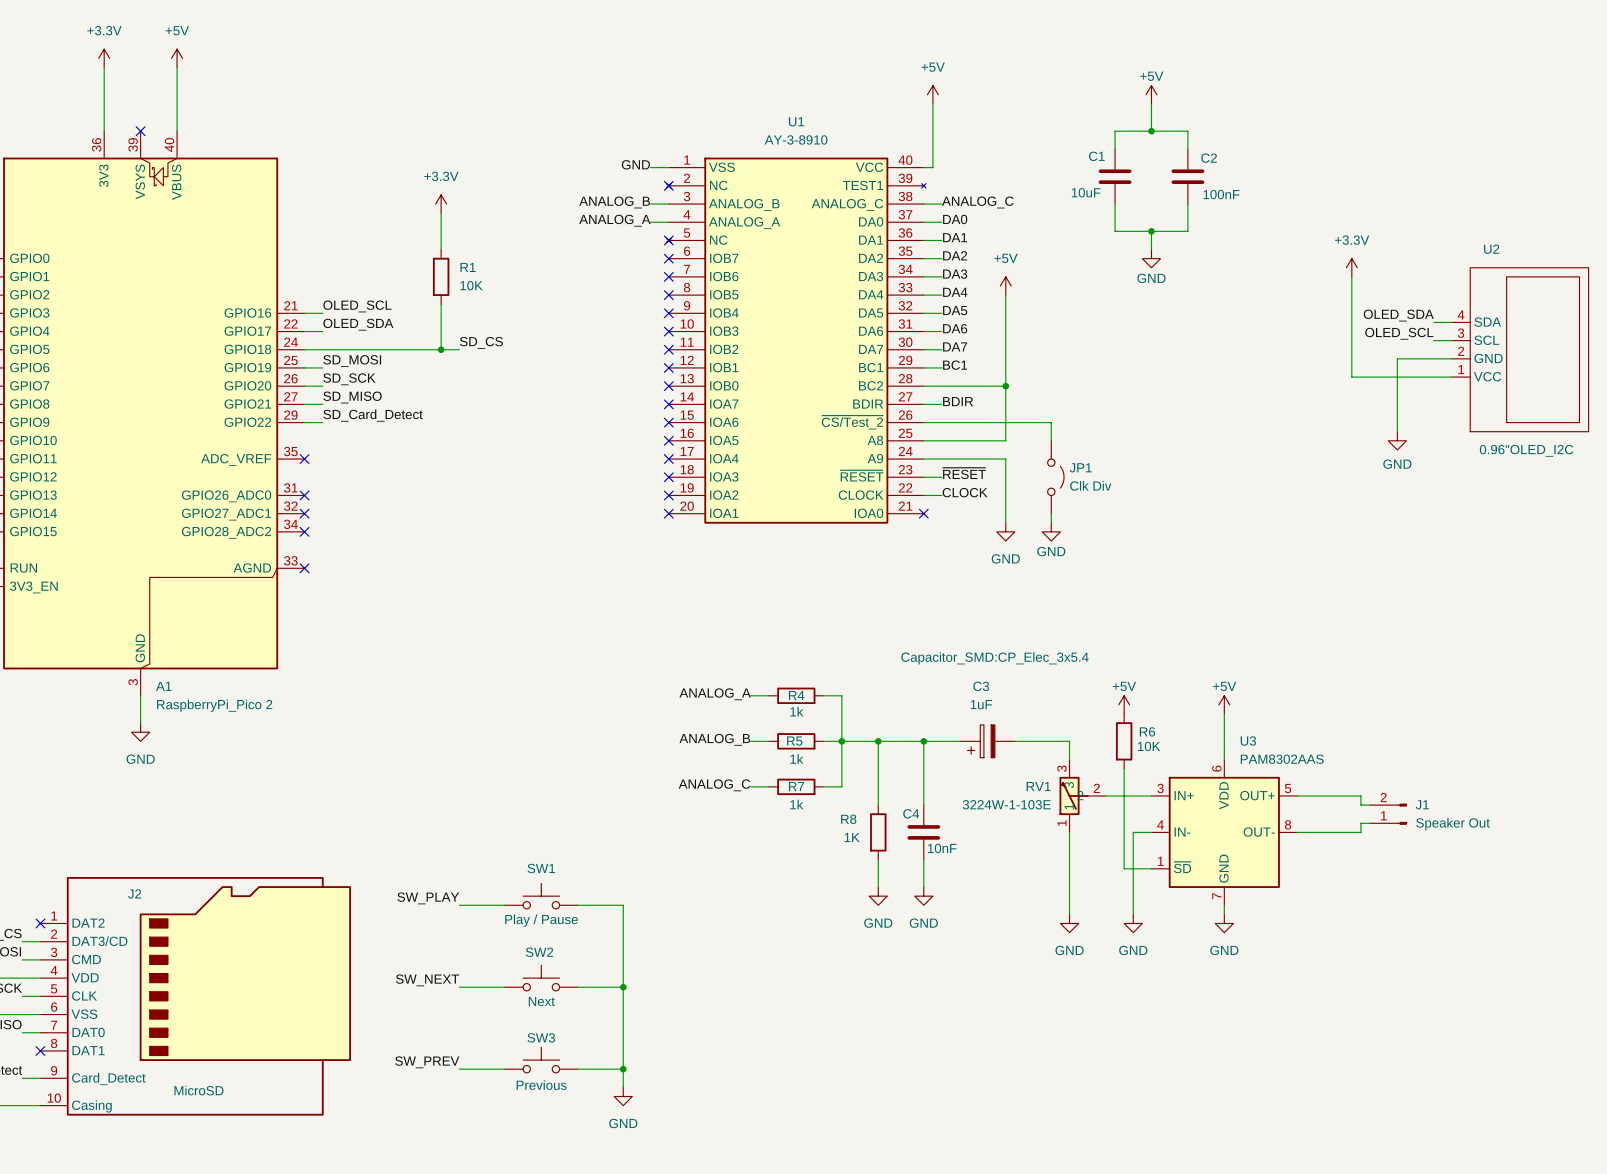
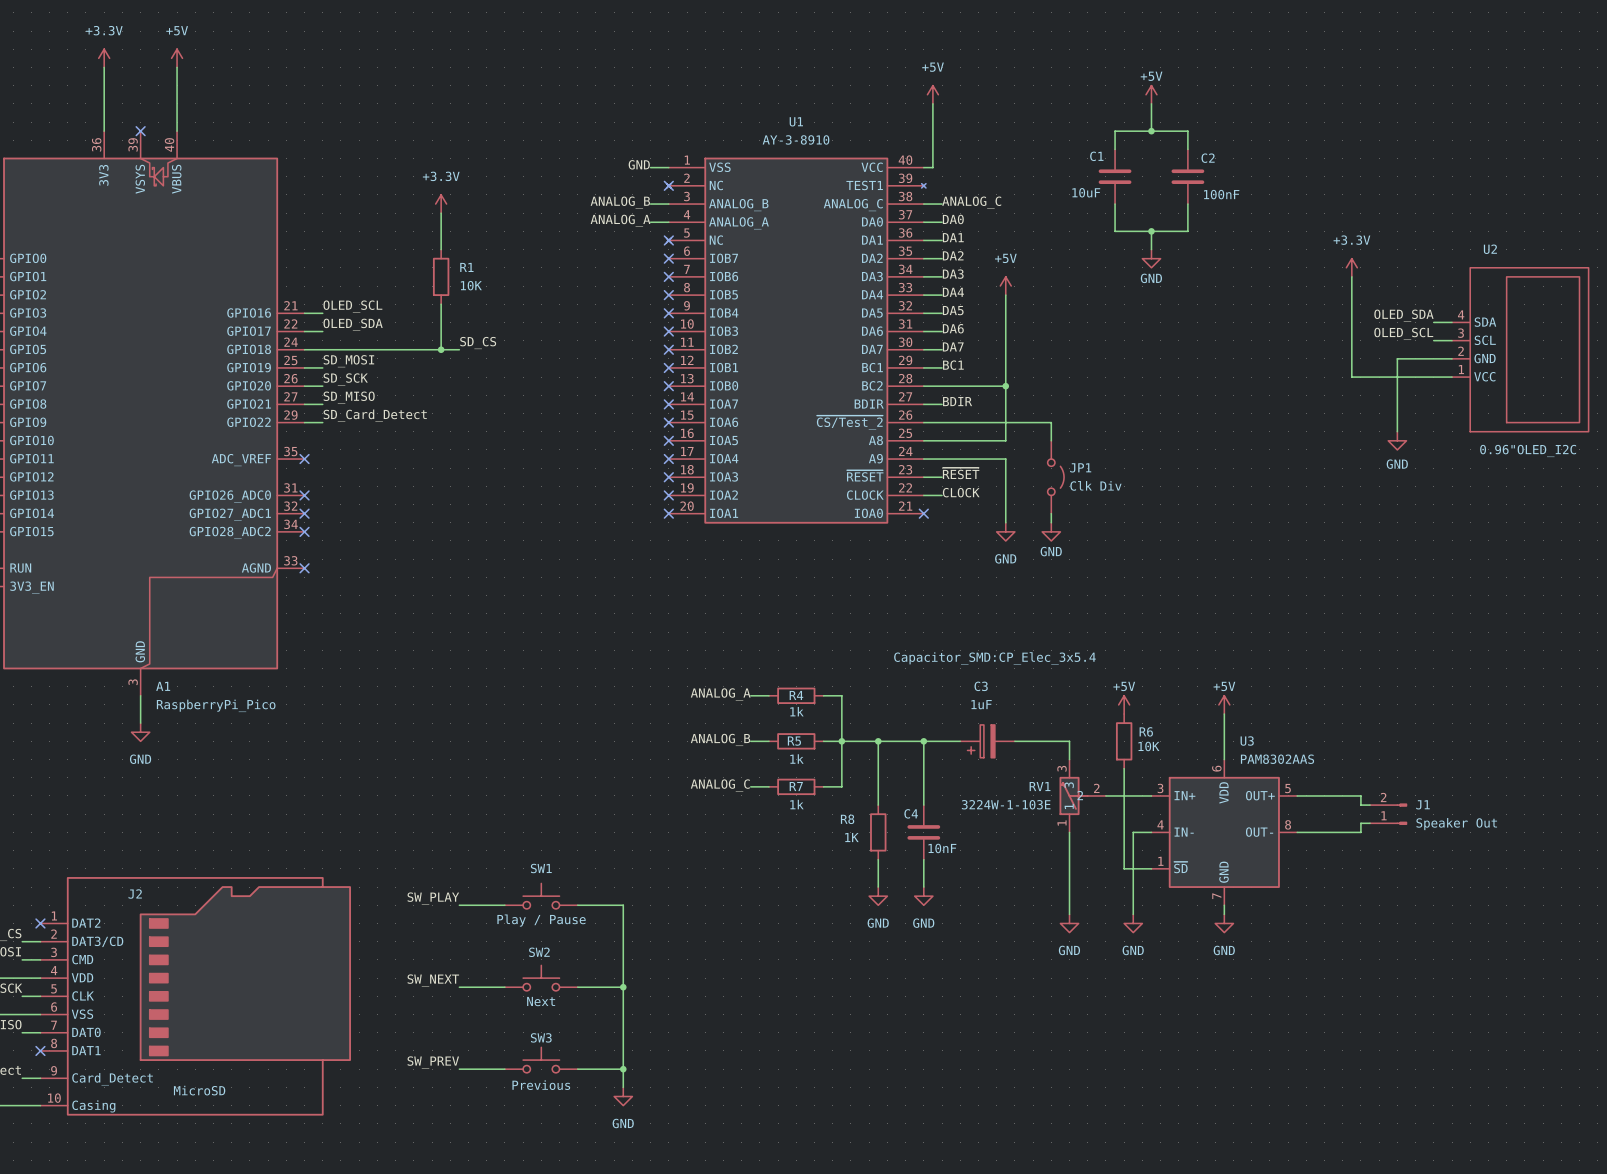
A1 value: RaspberryPi_Pico 2 (214, 705) -> RaspberryPi_Pico (216, 705)

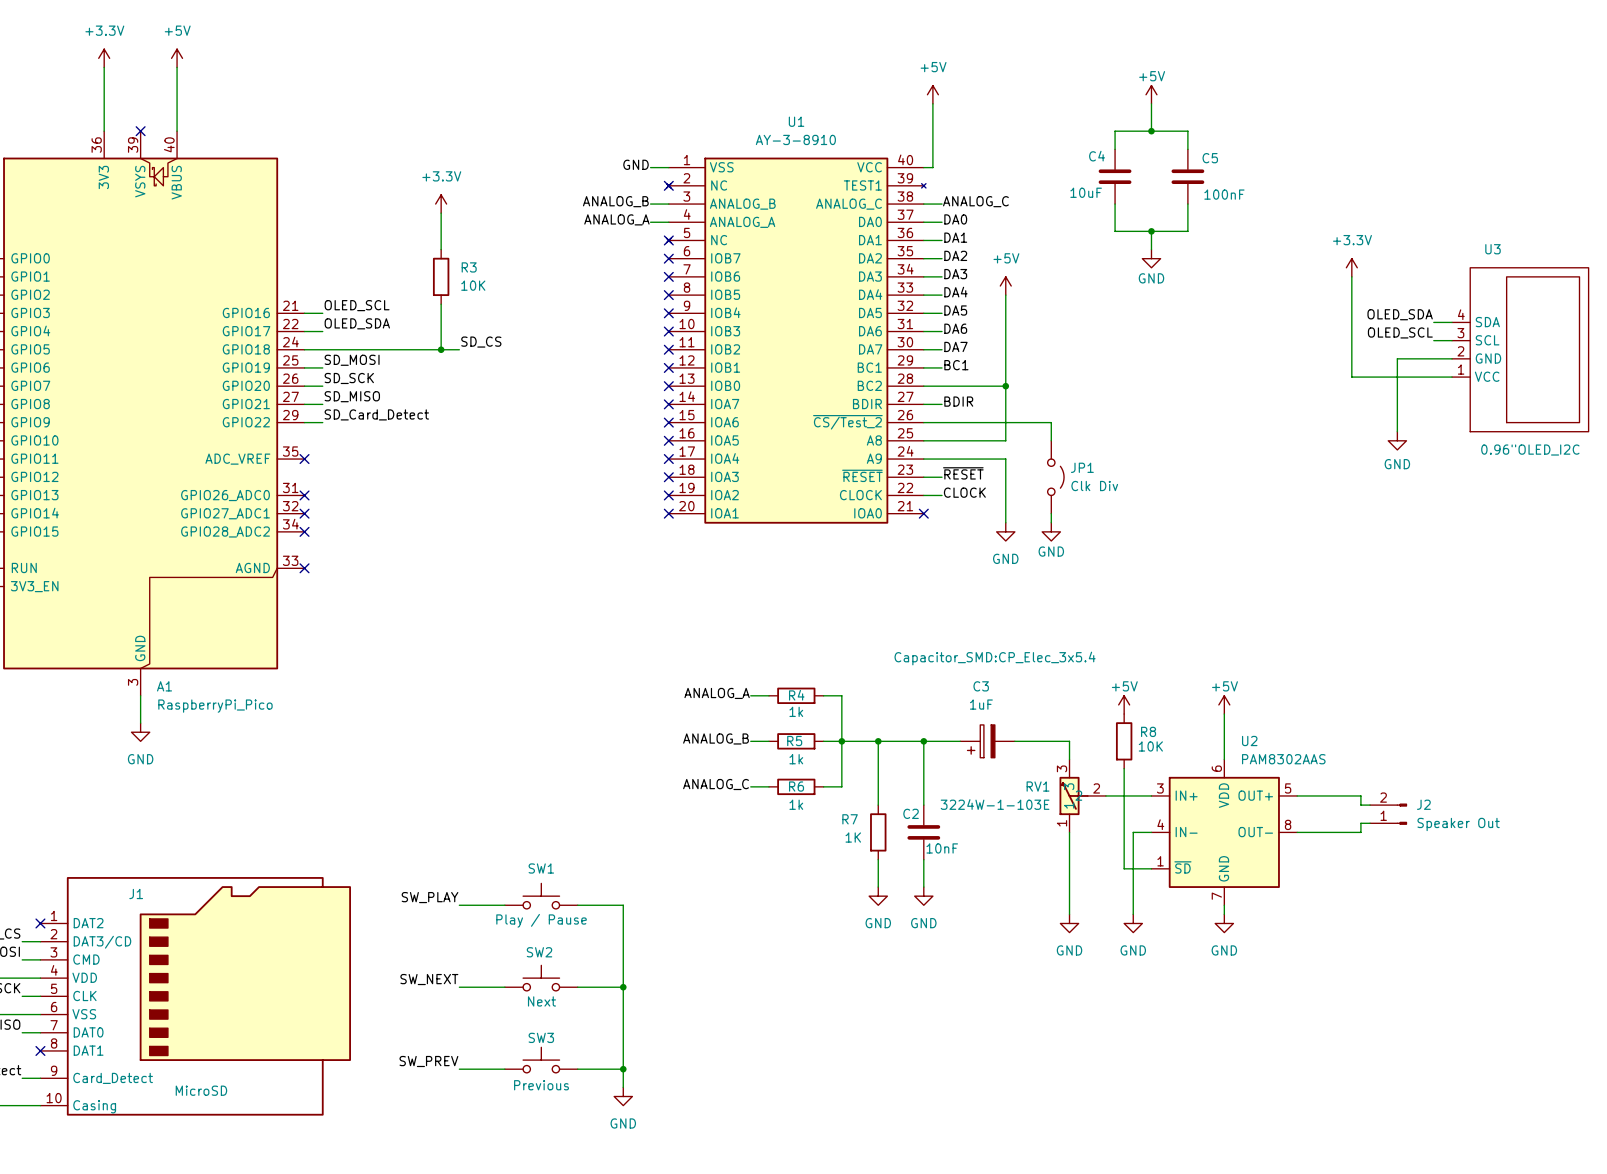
C1 name: C1 (1096, 156) -> C4 (1097, 156)
C2 name: C2 (1208, 158) -> C5 (1210, 158)
U2 name: U2 (1490, 249) -> U3 (1493, 249)
R1 name: R1 (466, 267) -> R3 (469, 267)
R6 name: R6 (1146, 731) -> R8 (1148, 731)
U3 name: U3 (1247, 741) -> U2 (1249, 741)
R7 name: R7 (796, 786) -> R6 (796, 786)
J1 name: J1 (1423, 804) -> J2 (1423, 804)
C4 name: C4 (911, 813) -> C2 (911, 813)
R8 name: R8 (847, 819) -> R7 (850, 819)
J2 name: J2 (135, 894) -> J1 (136, 893)

